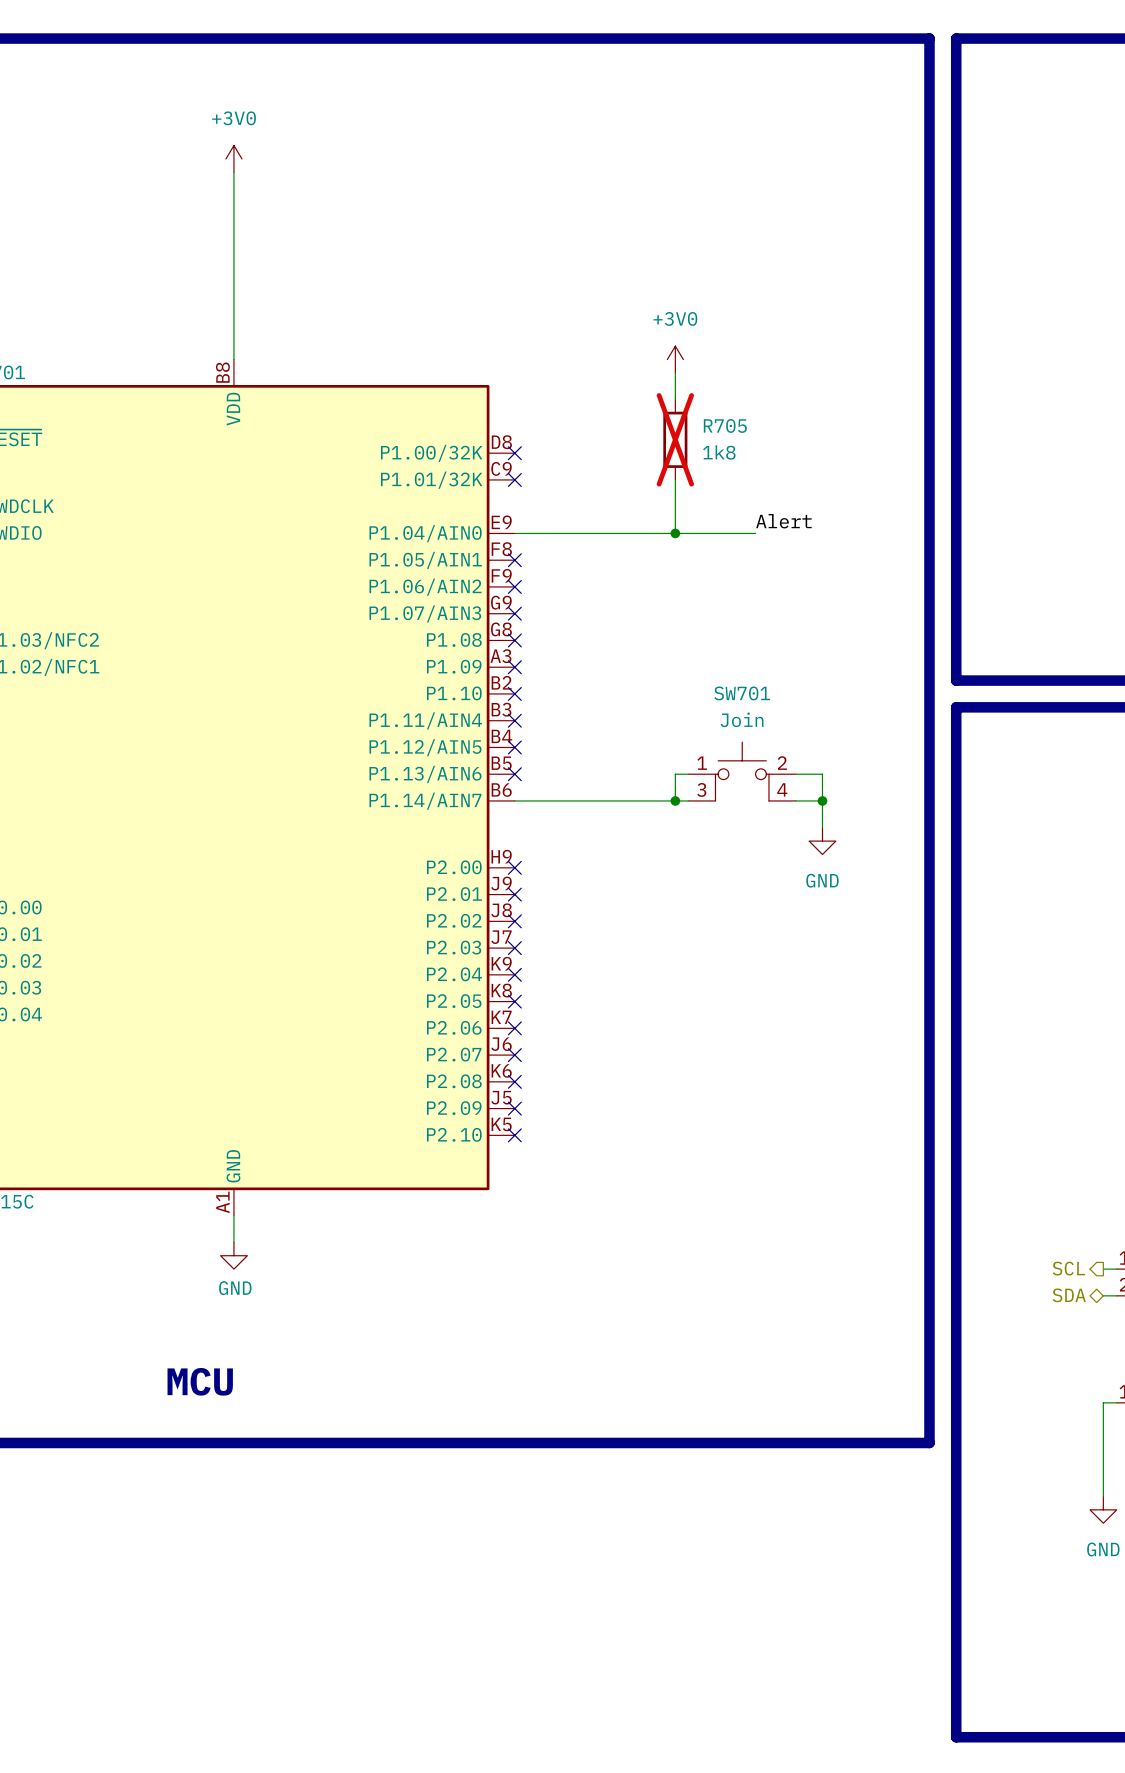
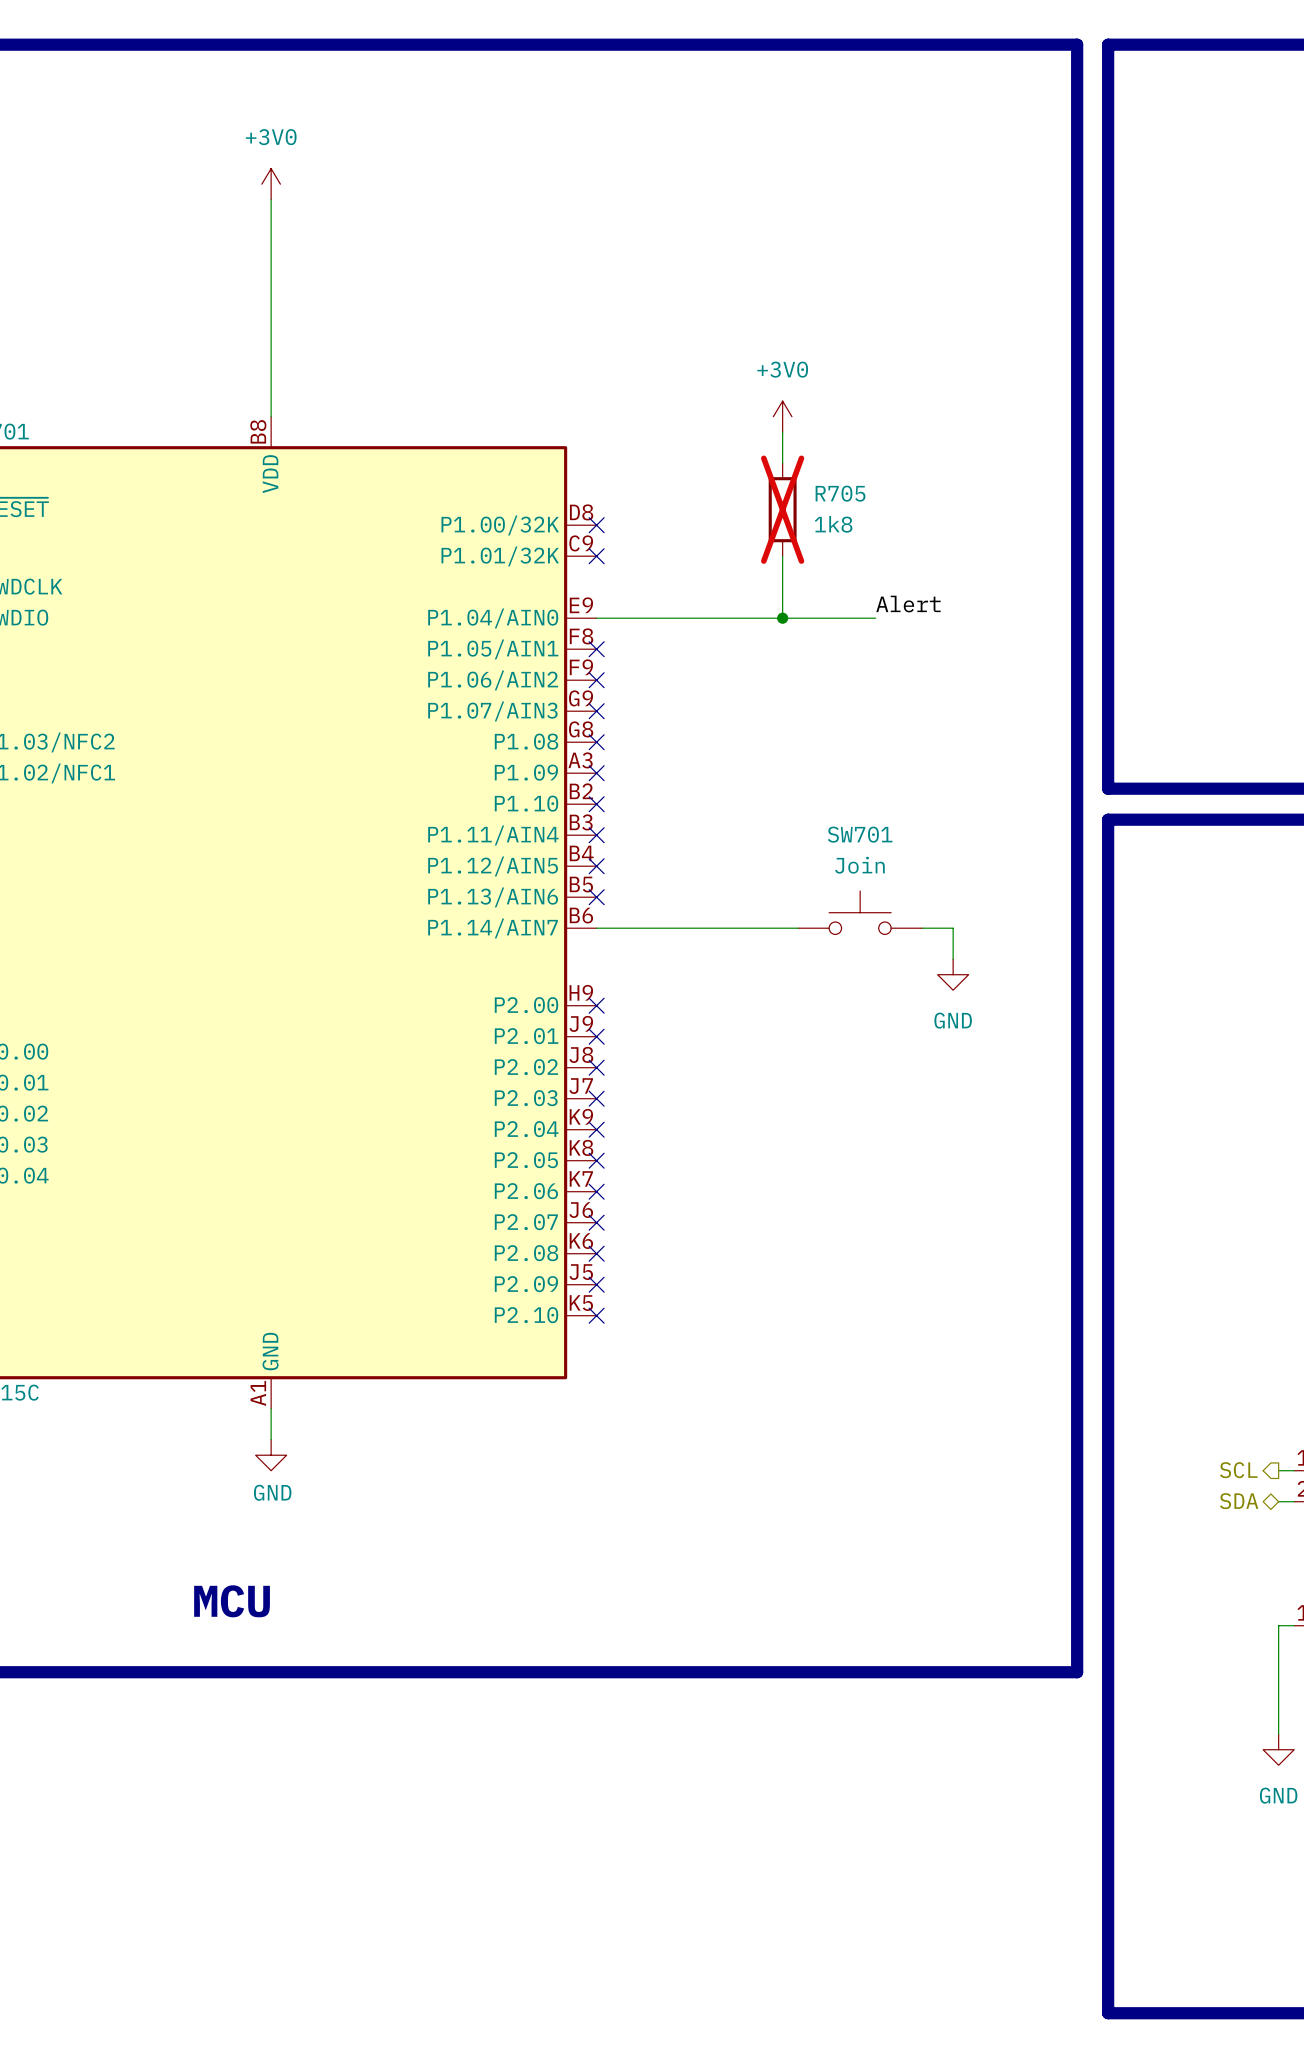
SW701 symbol: [688, 742, 796, 801] -> [798, 891, 923, 935]
wire: (688, 774) (675, 774) (675, 800) -> none
wire: (795, 774) (822, 774) (822, 800) -> none
junction: (675, 800) -> none
junction: (822, 800) -> none

